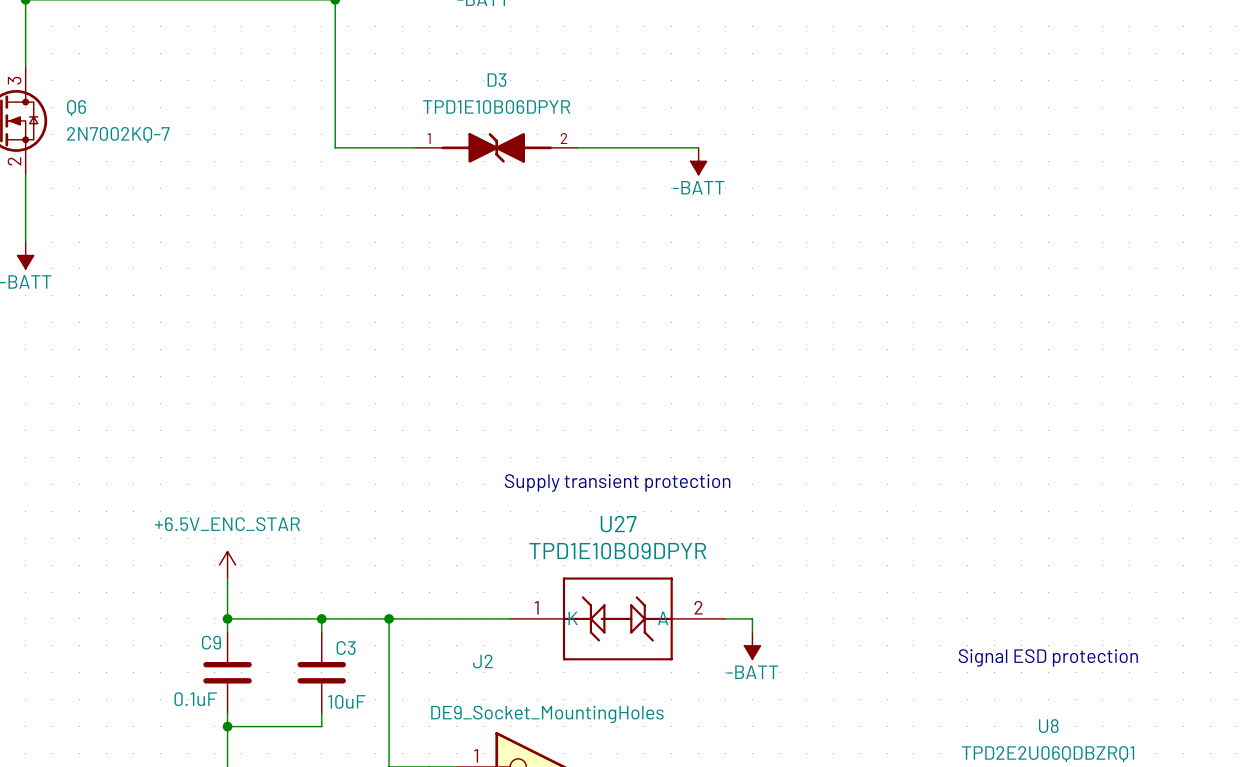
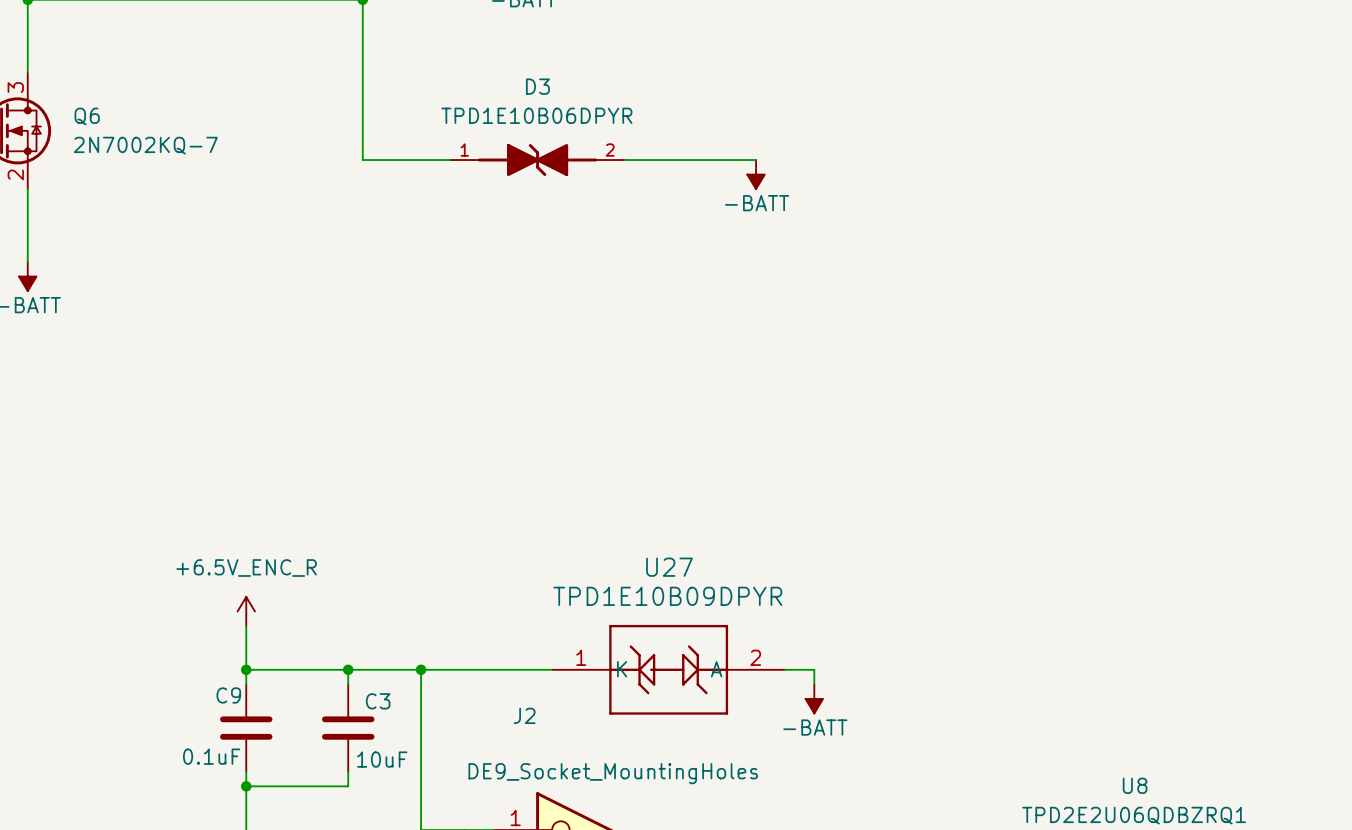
text: Supply transient protection (617, 483) -> none
power symbol: +6.5V_ENC_STAR (227, 565) -> +6.5V_ENC_R (246, 611)
text: Signal ESD protection (1048, 657) -> none

